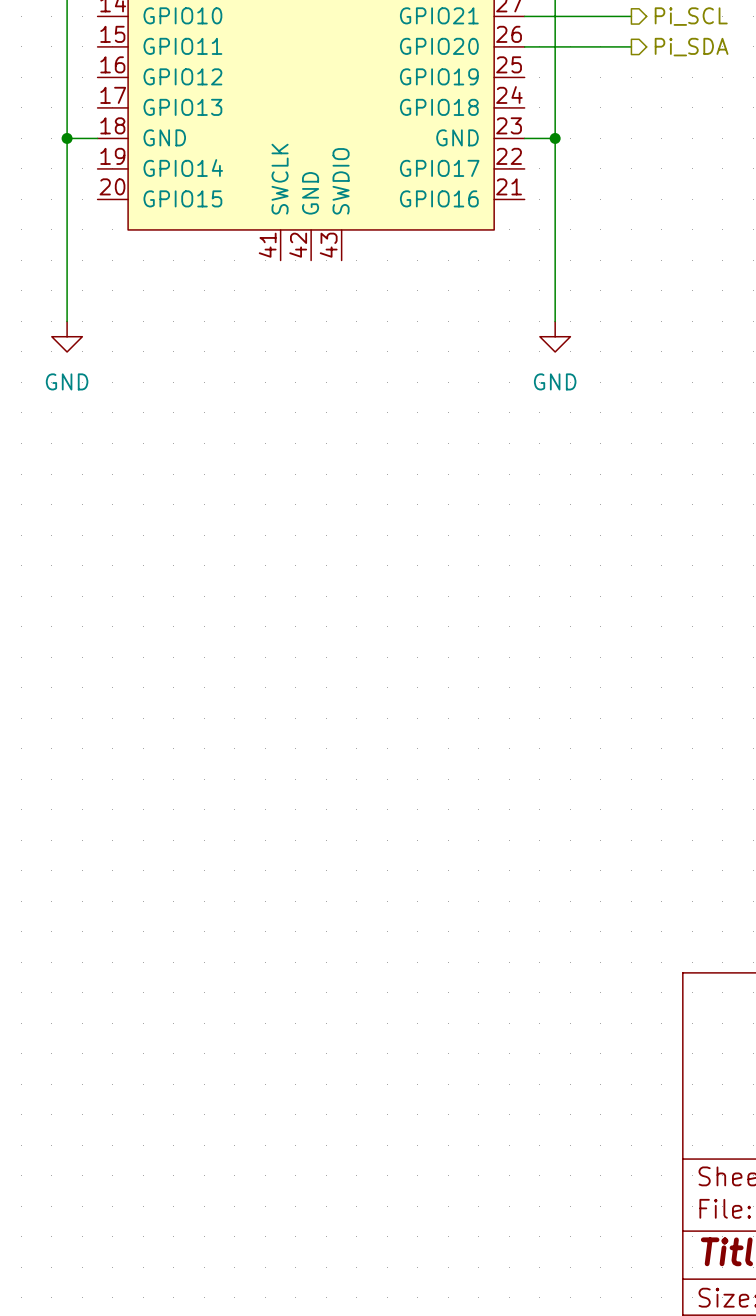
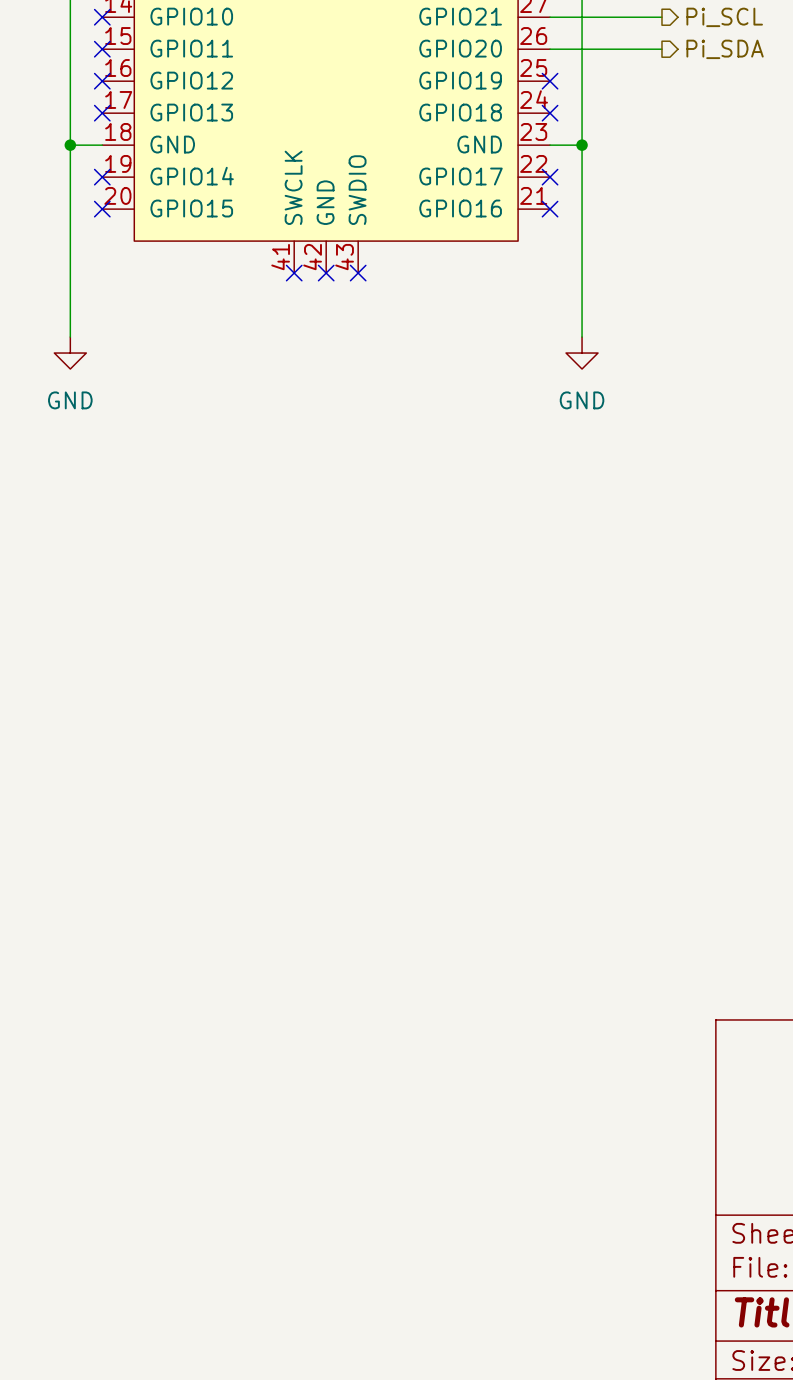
no-connect mark: none -> (102, 17)
no-connect mark: none -> (102, 49)
no-connect mark: none -> (102, 81)
no-connect mark: none -> (550, 81)
no-connect mark: none -> (102, 113)
no-connect mark: none -> (550, 113)
no-connect mark: none -> (102, 177)
no-connect mark: none -> (550, 177)
no-connect mark: none -> (102, 209)
no-connect mark: none -> (550, 209)
no-connect mark: none -> (294, 273)
no-connect mark: none -> (326, 273)
no-connect mark: none -> (358, 273)

